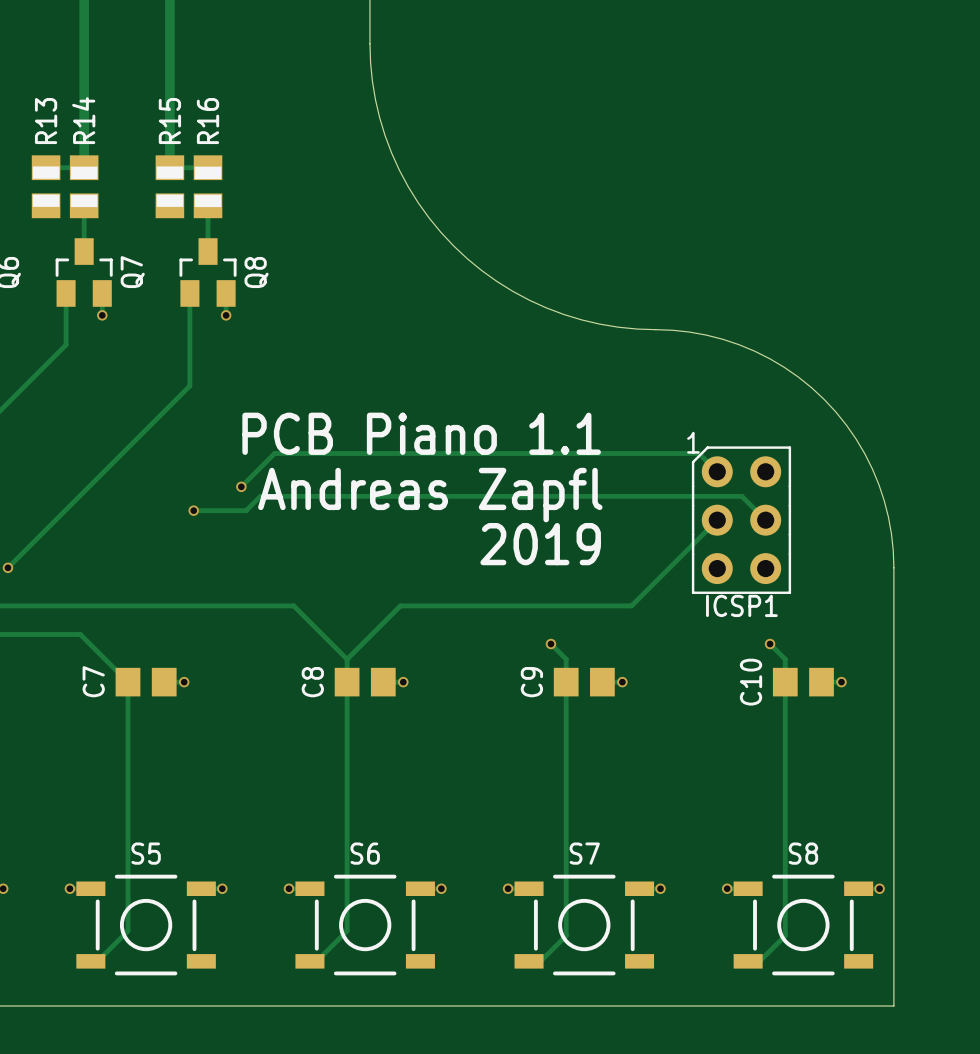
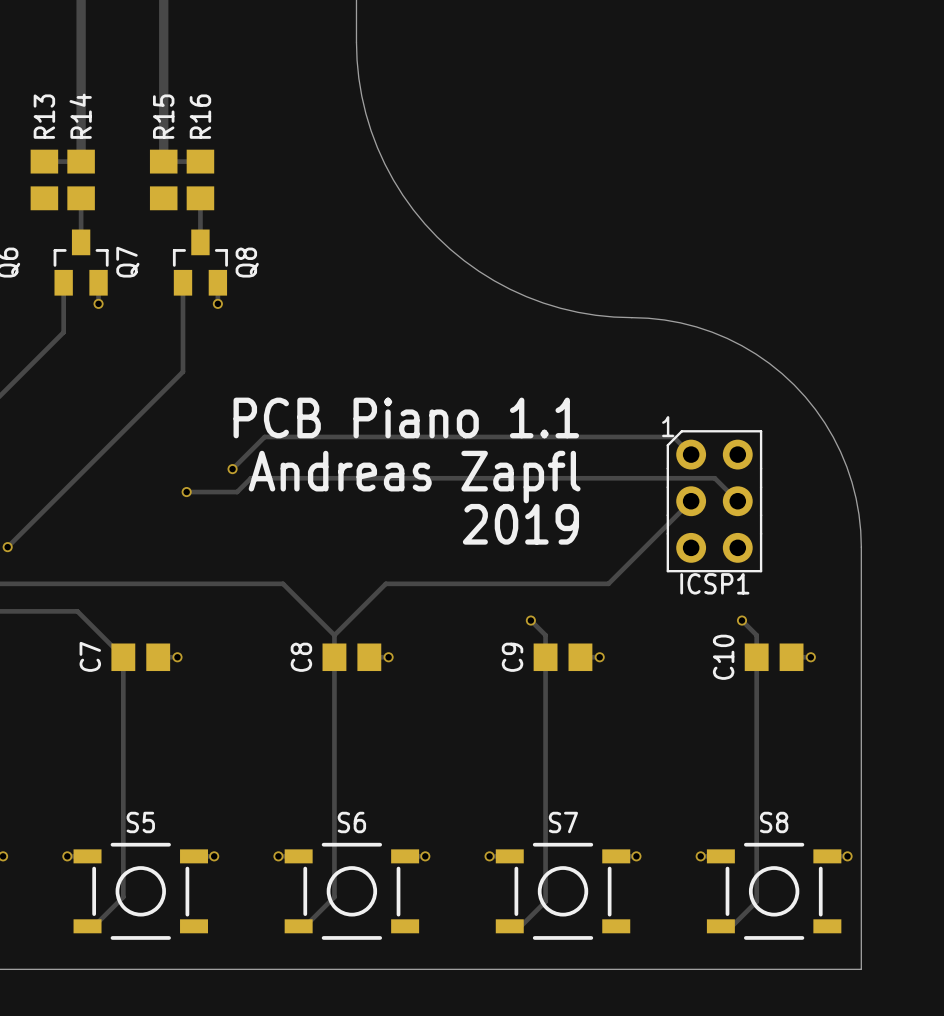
R13 footprint: [31, 155, 61, 219] -> [30, 149, 59, 211]
R14 footprint: [69, 155, 99, 219] -> [67, 149, 95, 211]
R15 footprint: [155, 155, 185, 219] -> [149, 149, 178, 211]
R16 footprint: [193, 155, 223, 219] -> [186, 149, 215, 211]

